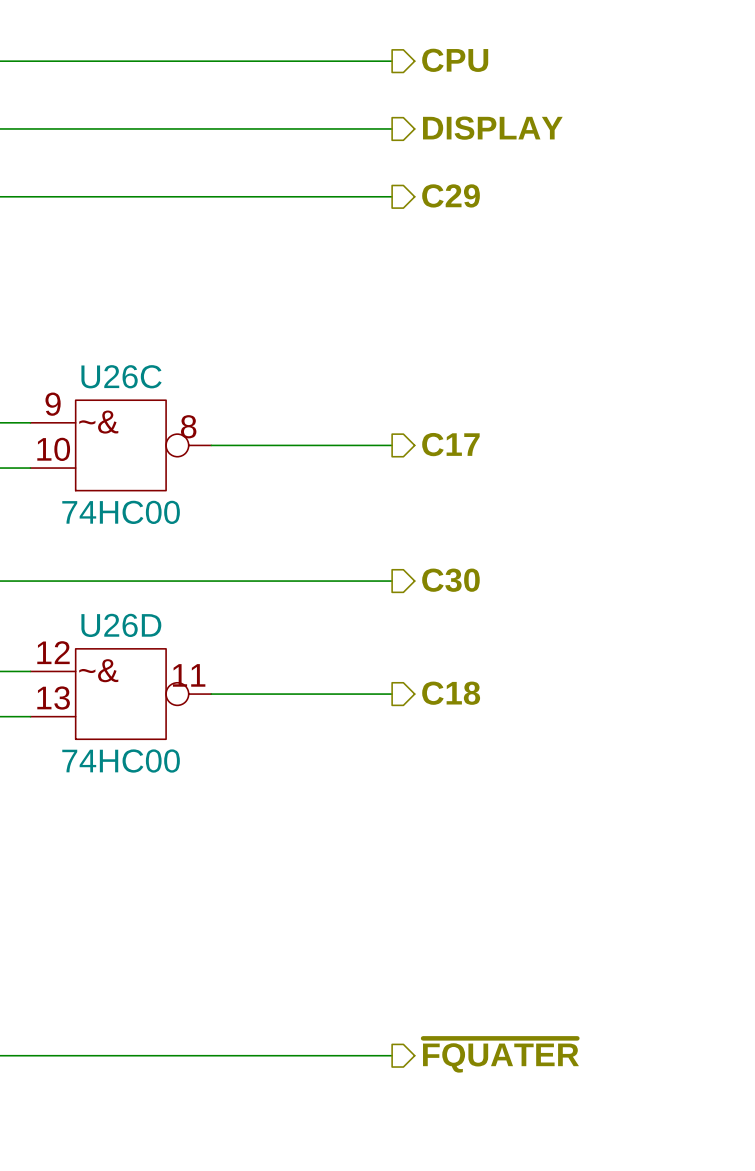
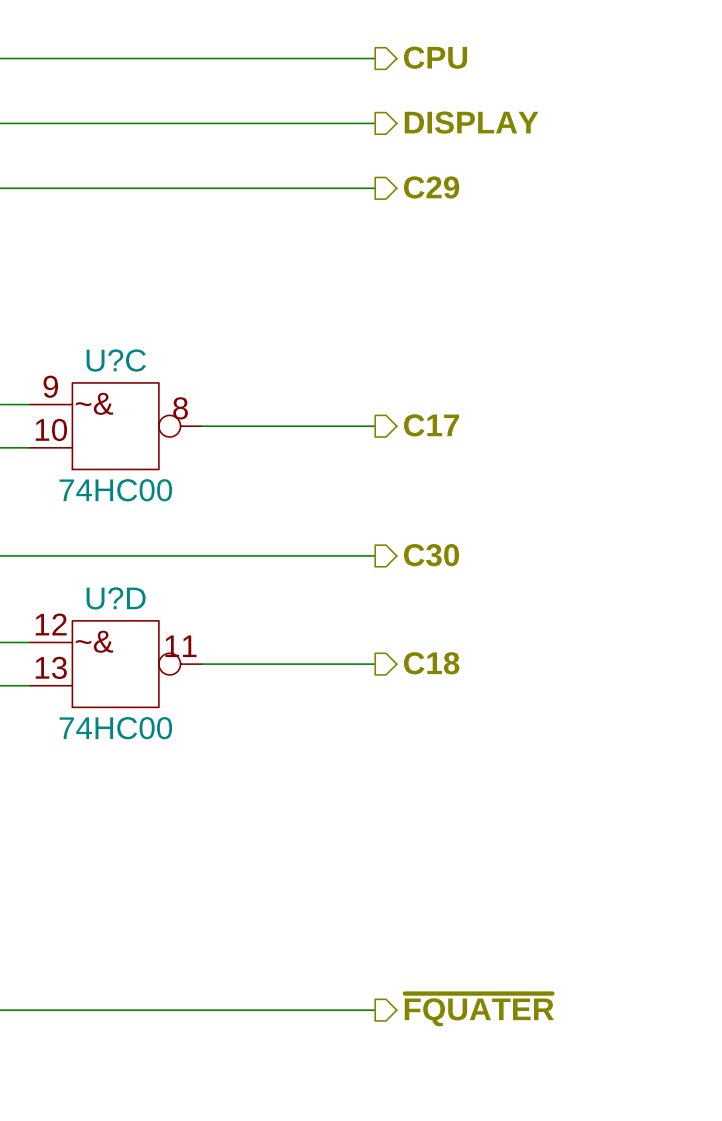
U26C name: U26C (121, 376) -> U?C (116, 360)
U26D name: U26D (121, 625) -> U?D (116, 598)

